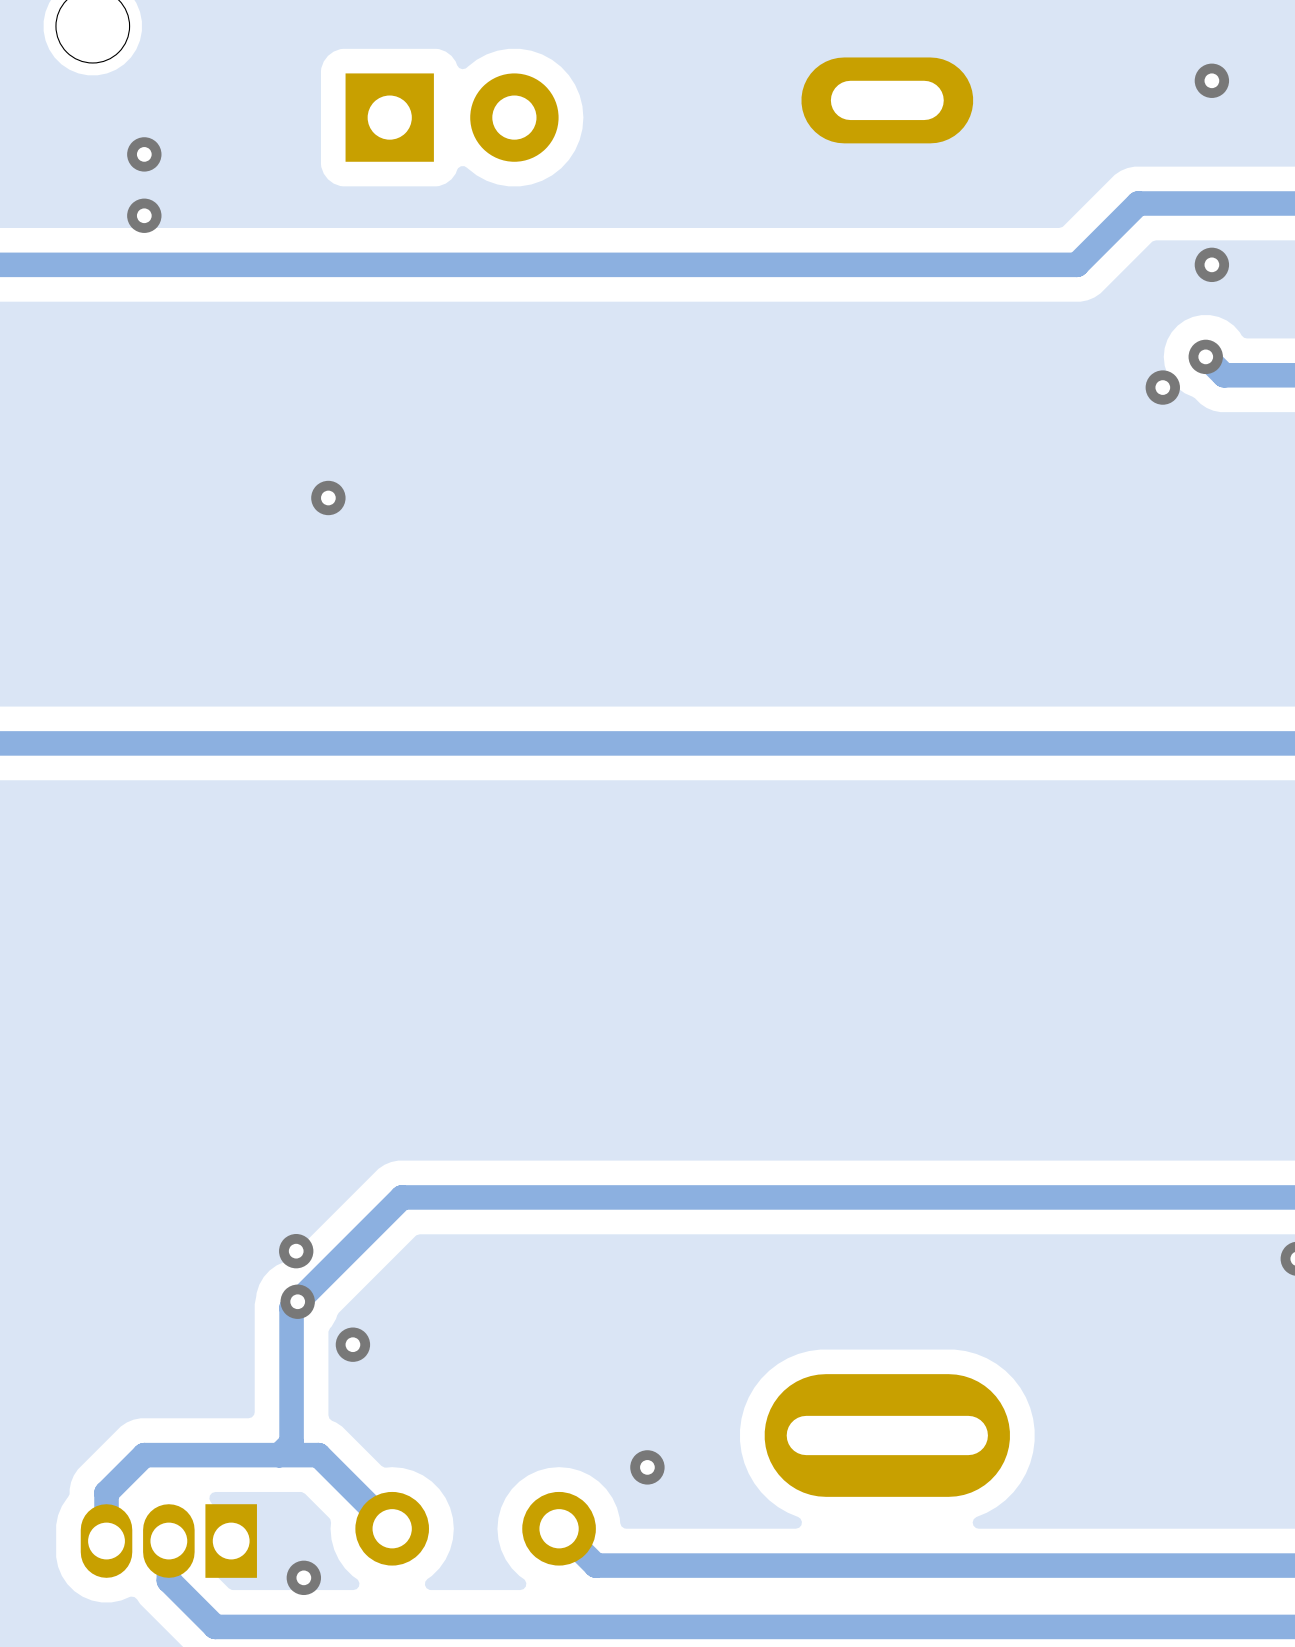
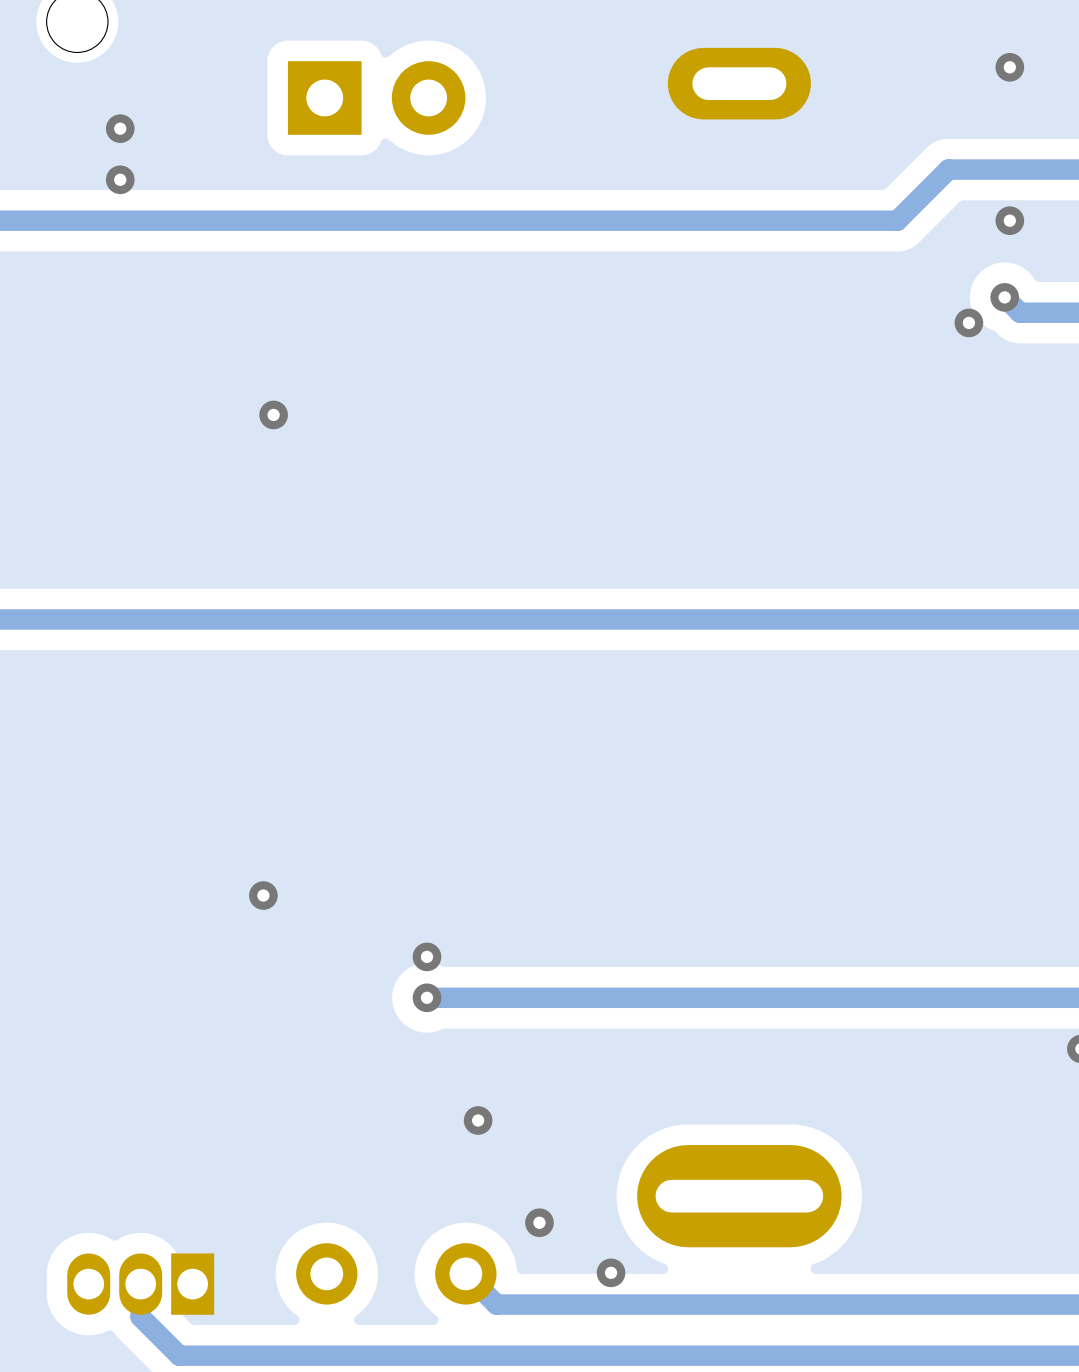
via: none -> (263, 895)
via: none -> (427, 956)
track: (512, 1197) (402, 1197) (291, 1307) (291, 1442) (279, 1455) -> none
via: none -> (427, 997)
via: (296, 1251) -> none
via: (297, 1301) -> none
via: (352, 1344) -> none
via: none -> (478, 1120)
via: none -> (611, 1272)
track: (392, 1528) (318, 1455) (144, 1455) (106, 1492) (106, 1541) -> none
via: (303, 1577) -> none

